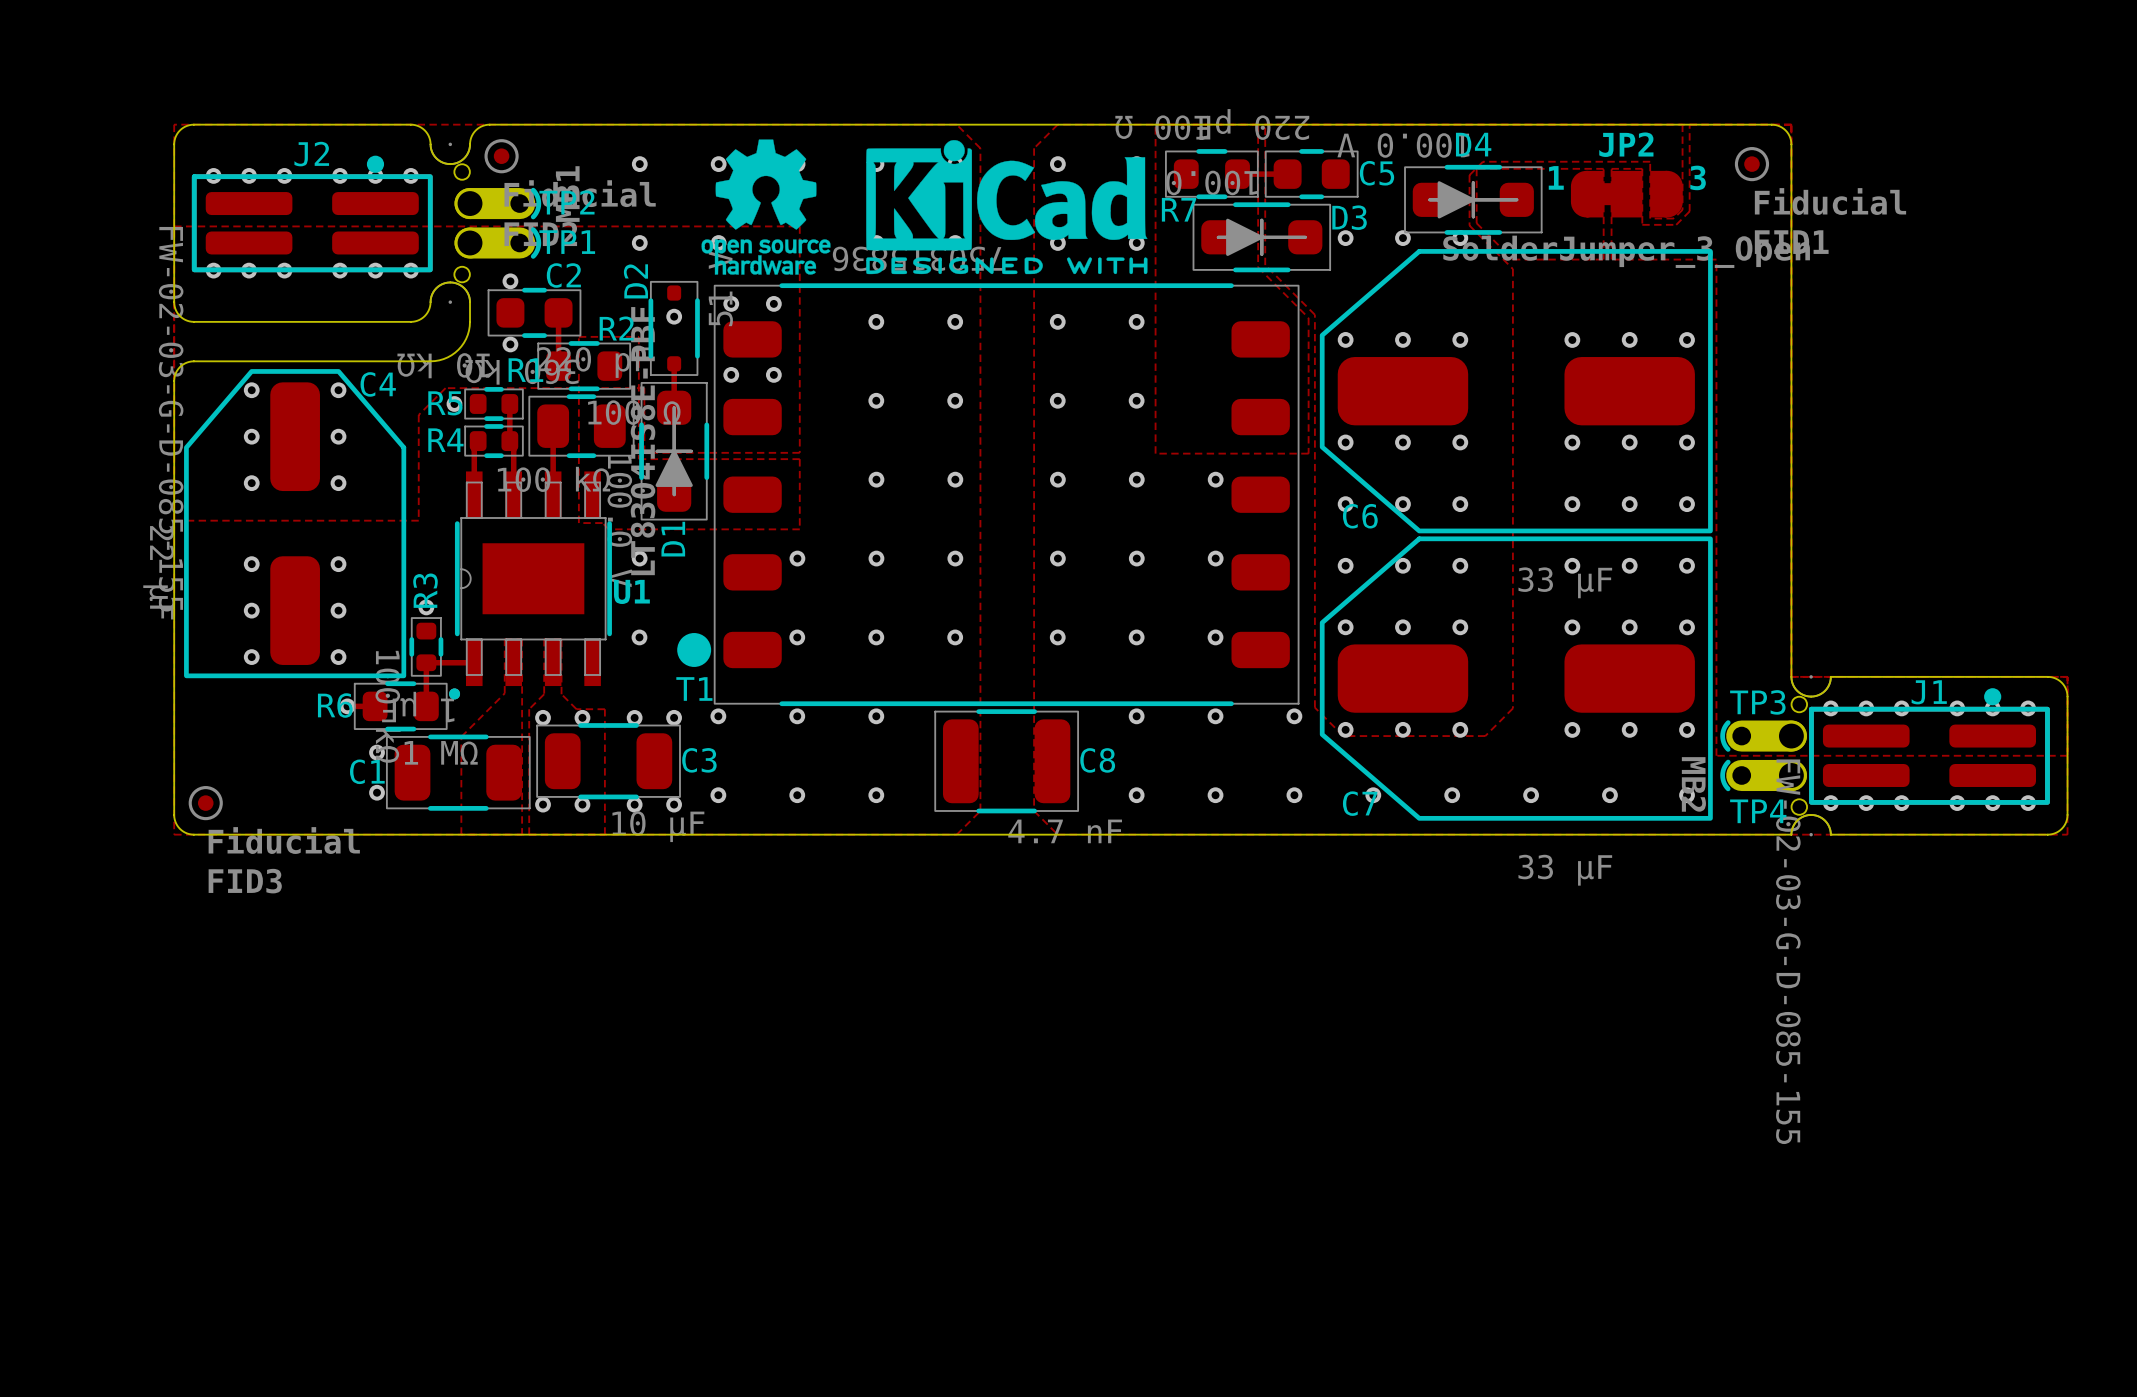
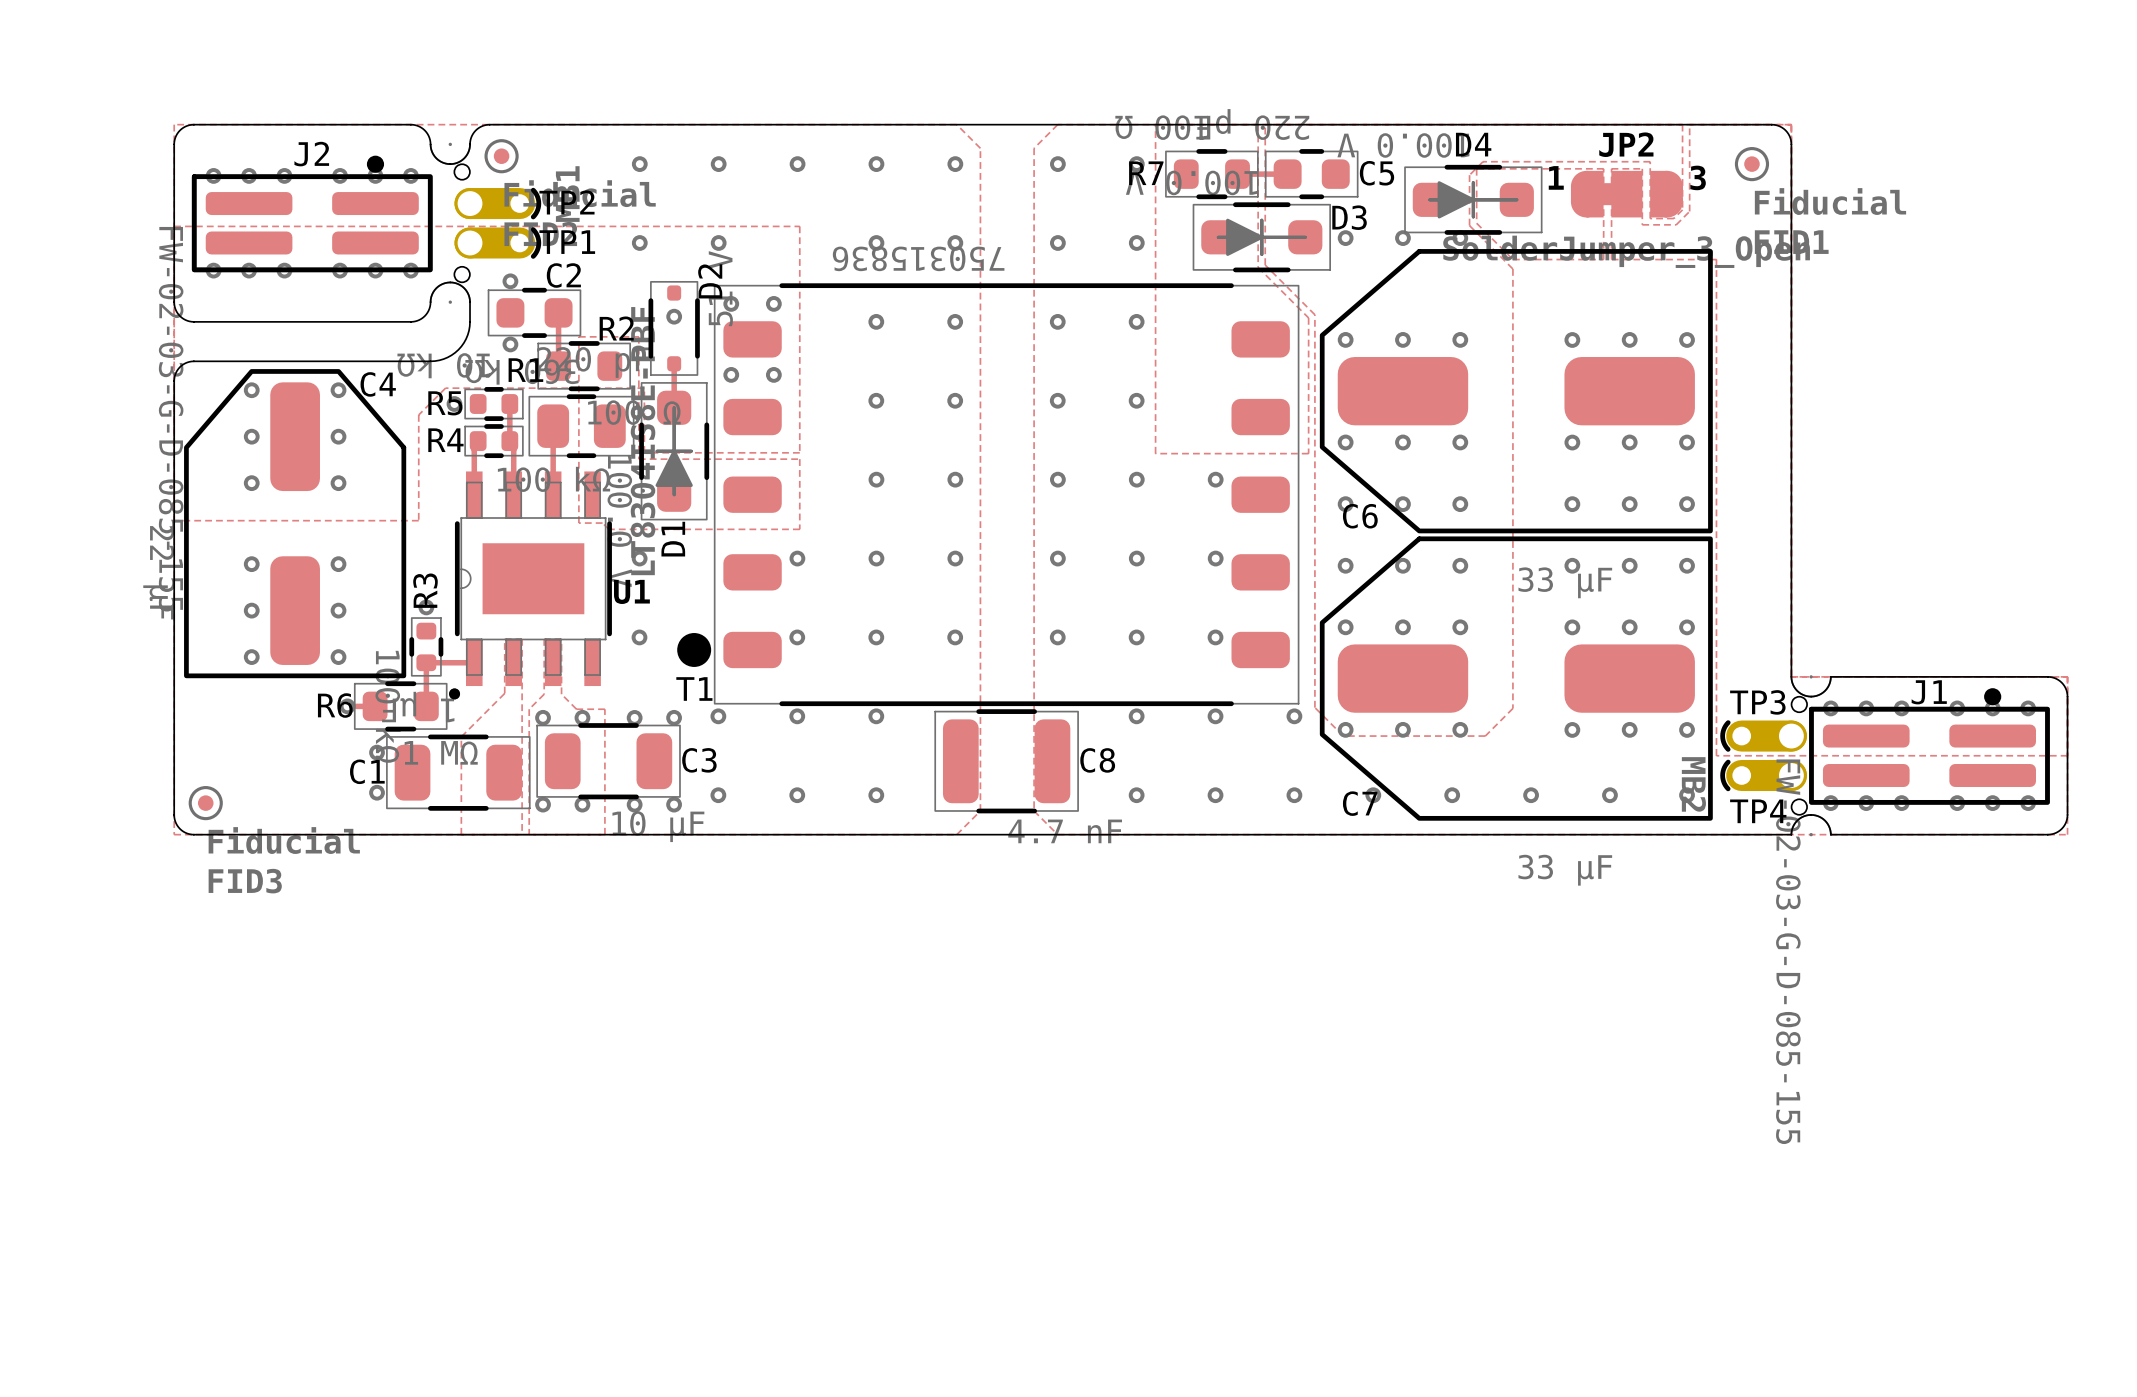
drawing: [701, 139, 1148, 275] -> none
R7 name position: R7 (1179, 209) -> R7 (1146, 173)
D2 name position: D2 (635, 281) -> D2 (710, 281)

